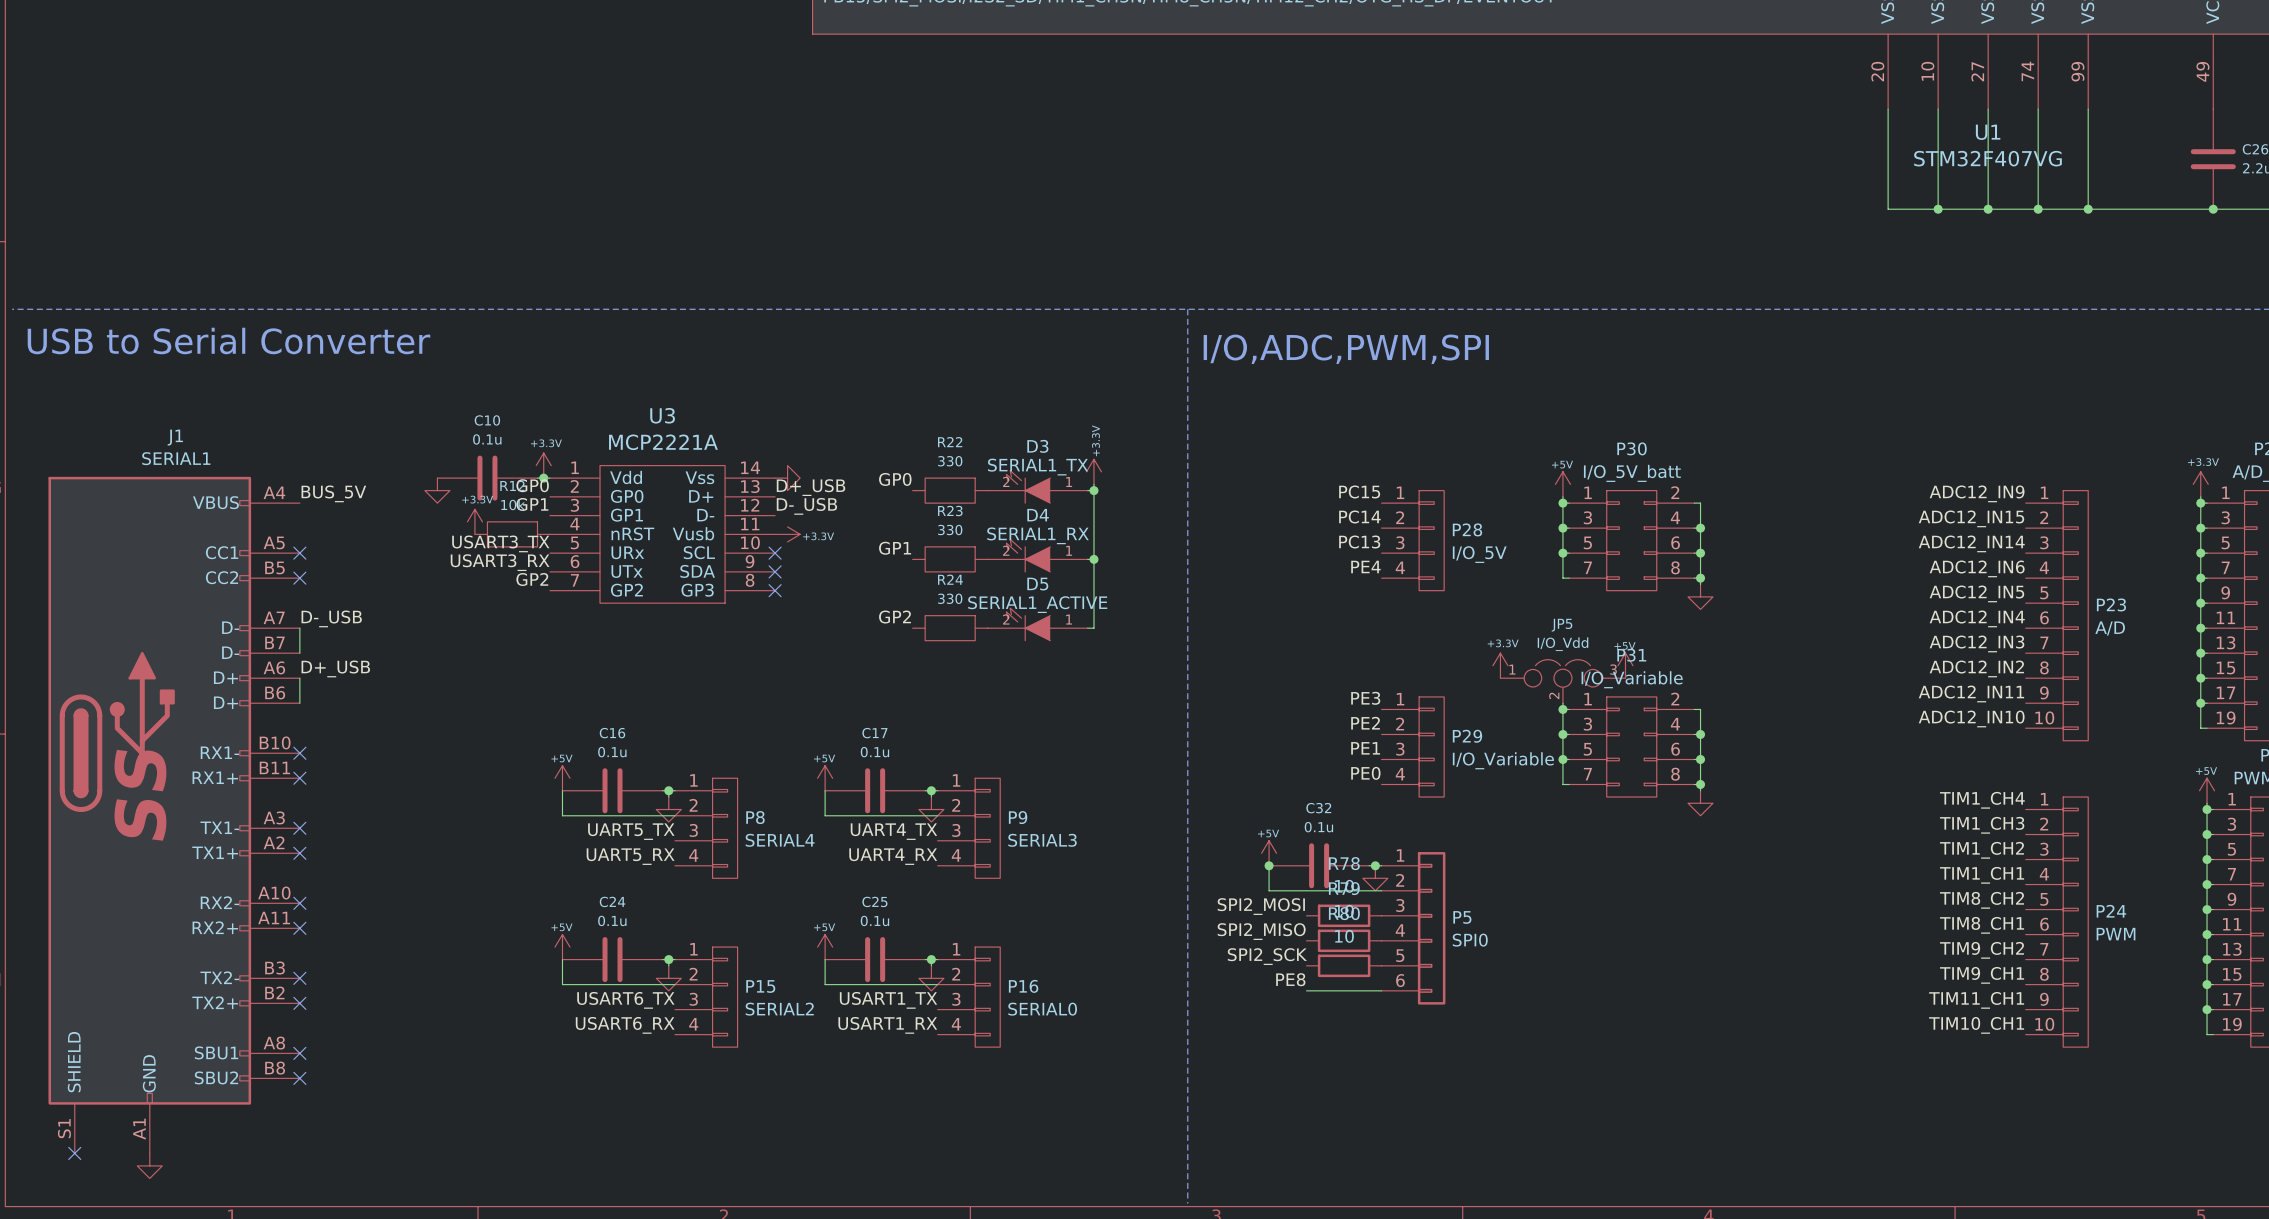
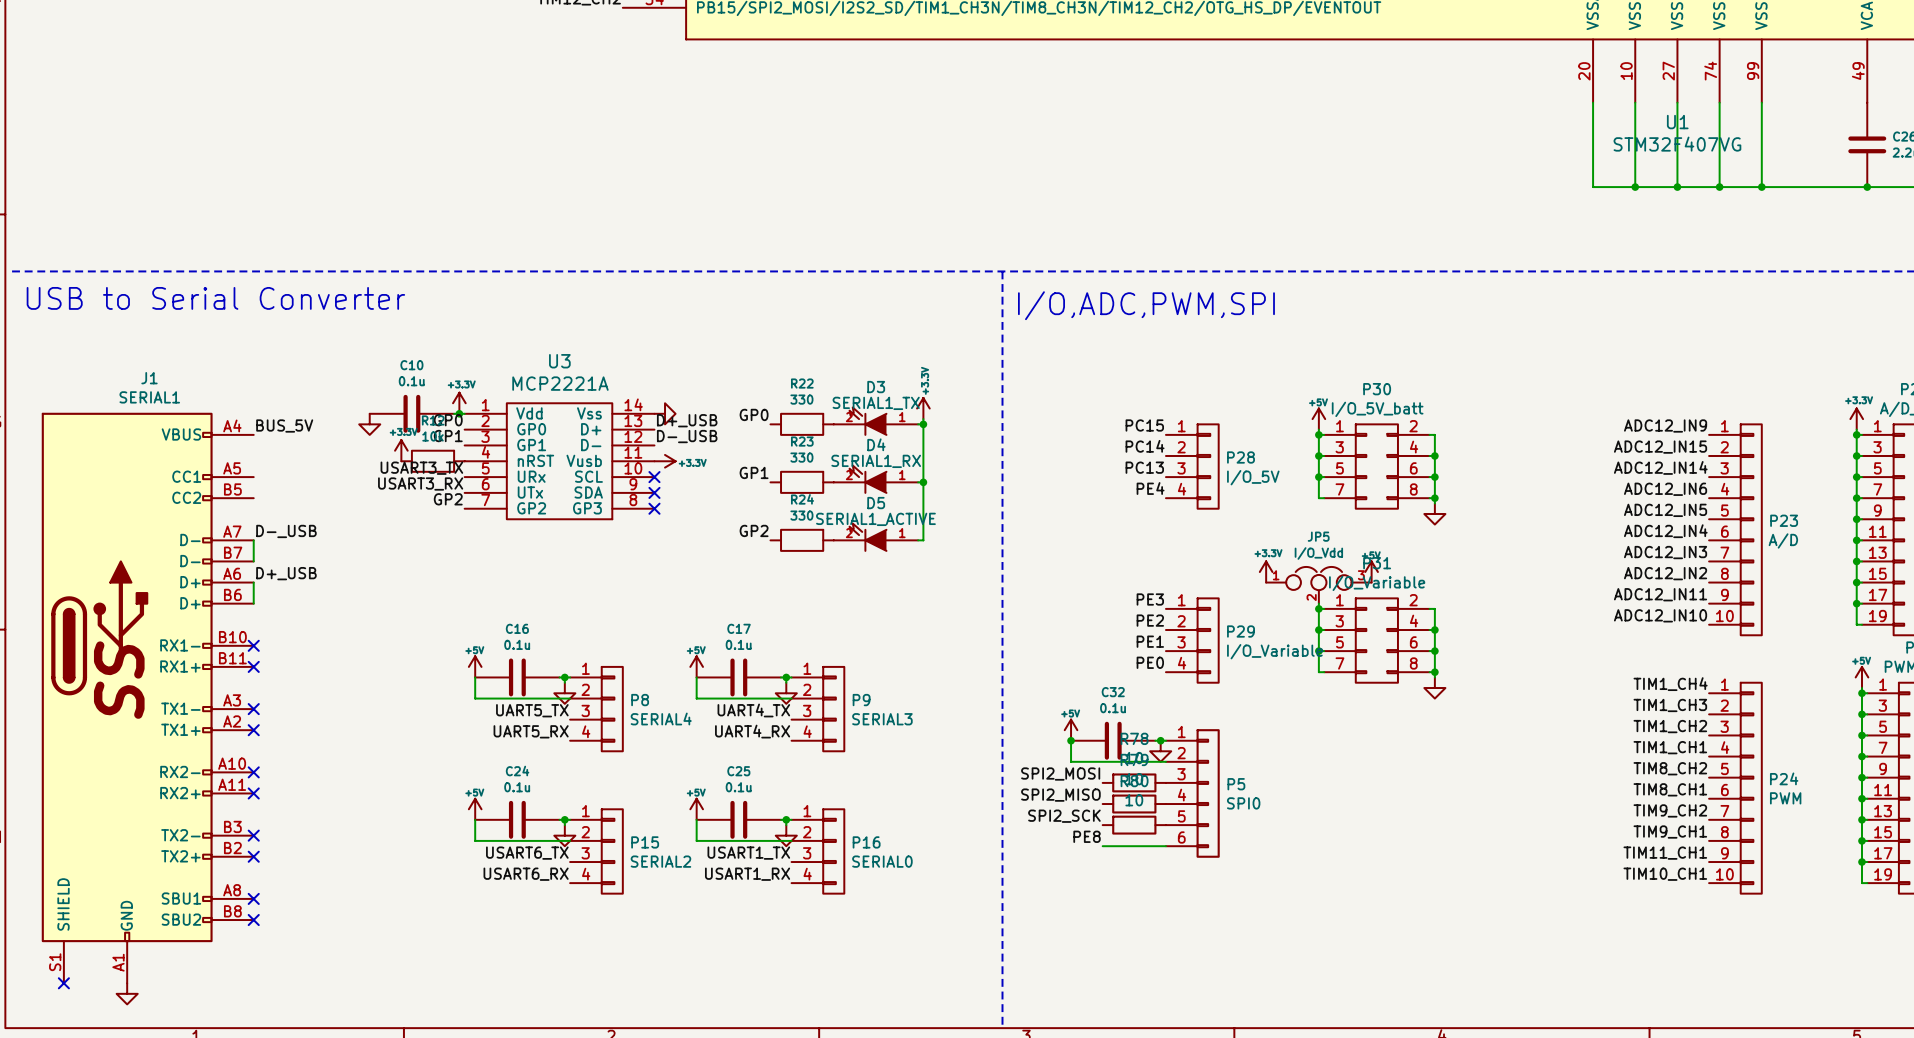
no-connect mark: (299, 553) -> none
no-connect mark: (299, 578) -> none

